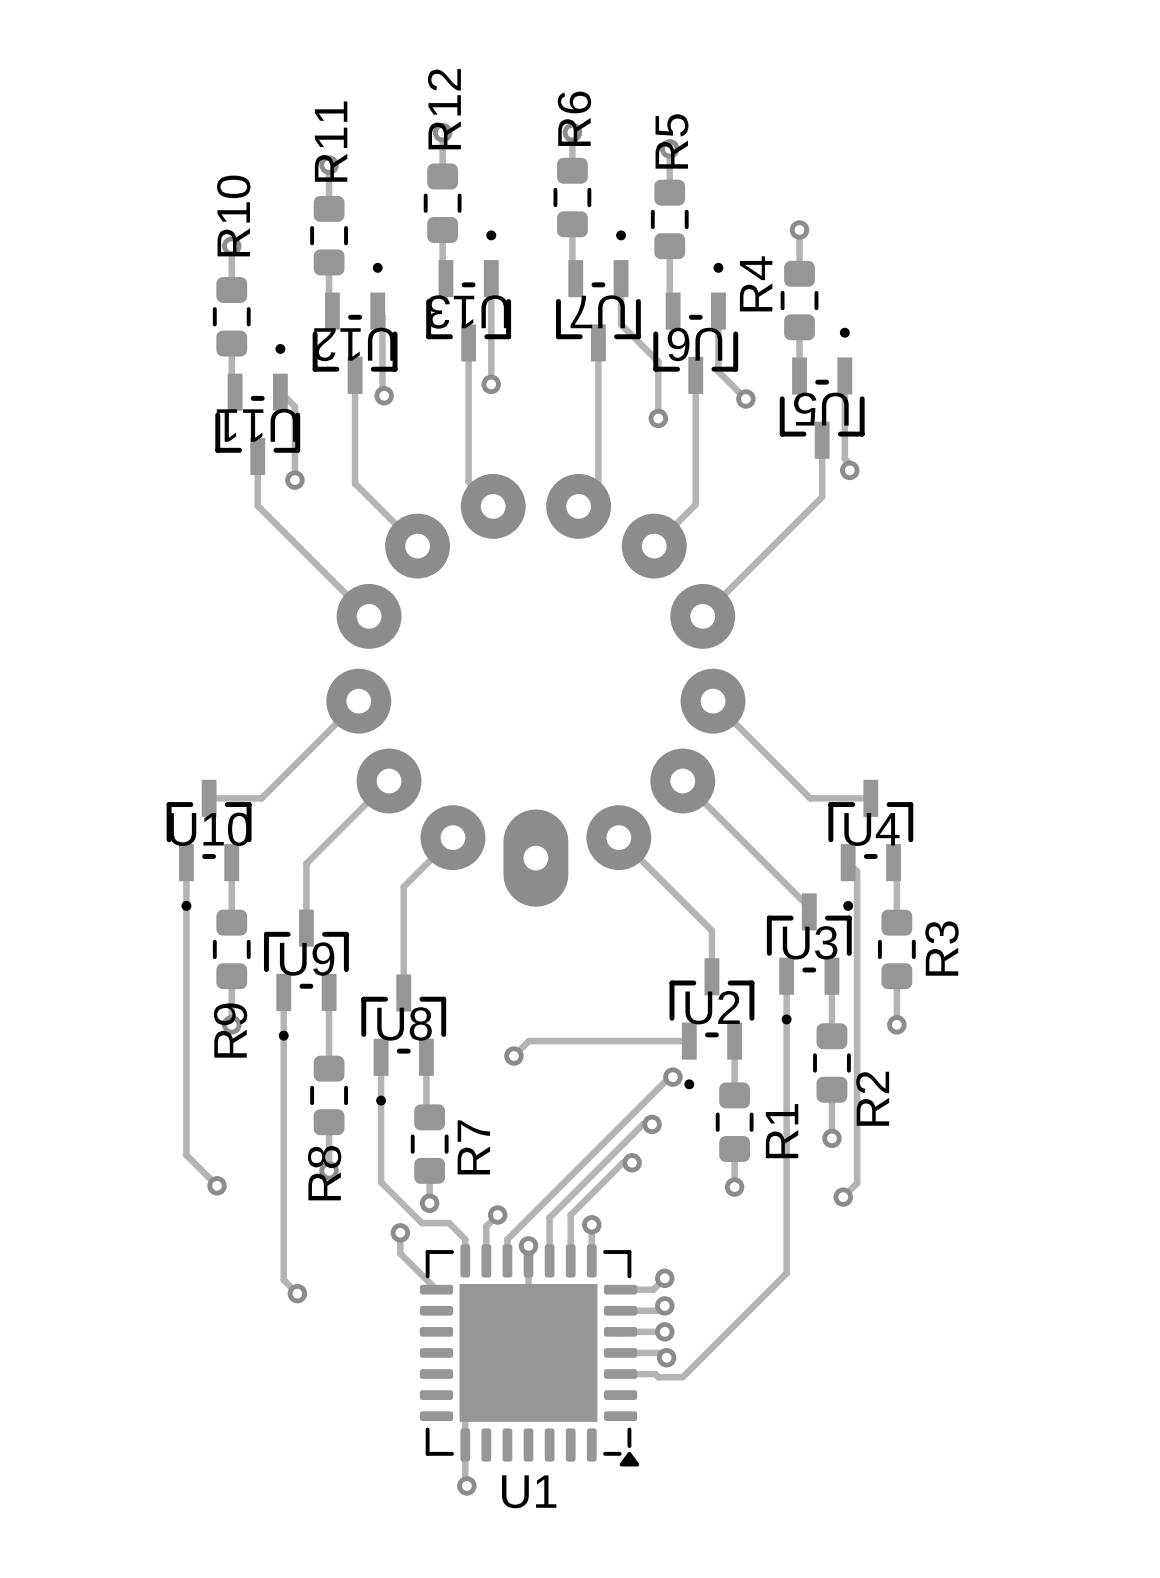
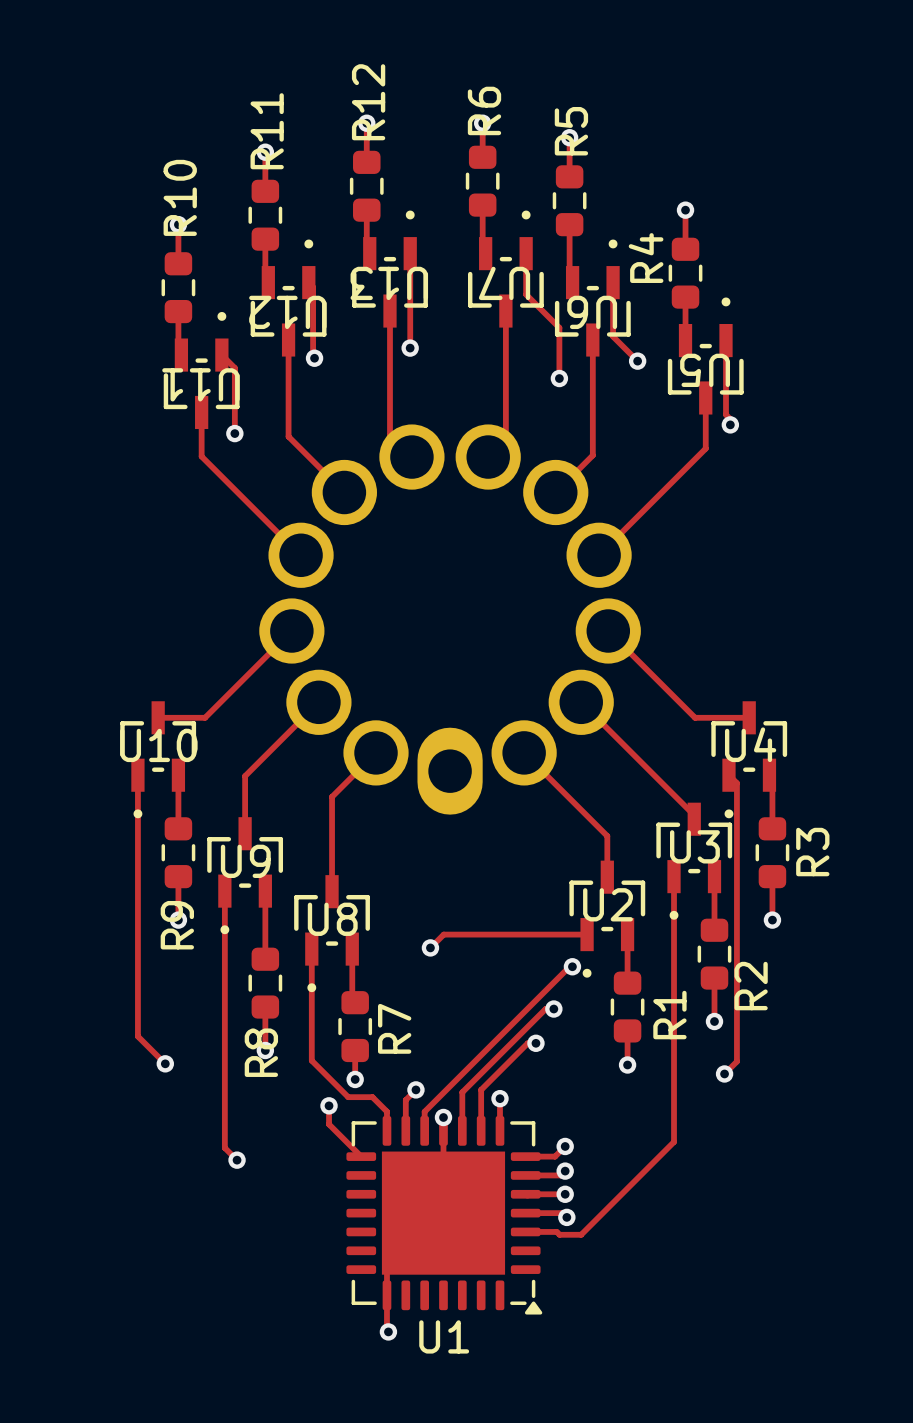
part footprint: [326, 473, 746, 907] -> [259, 424, 641, 815]

